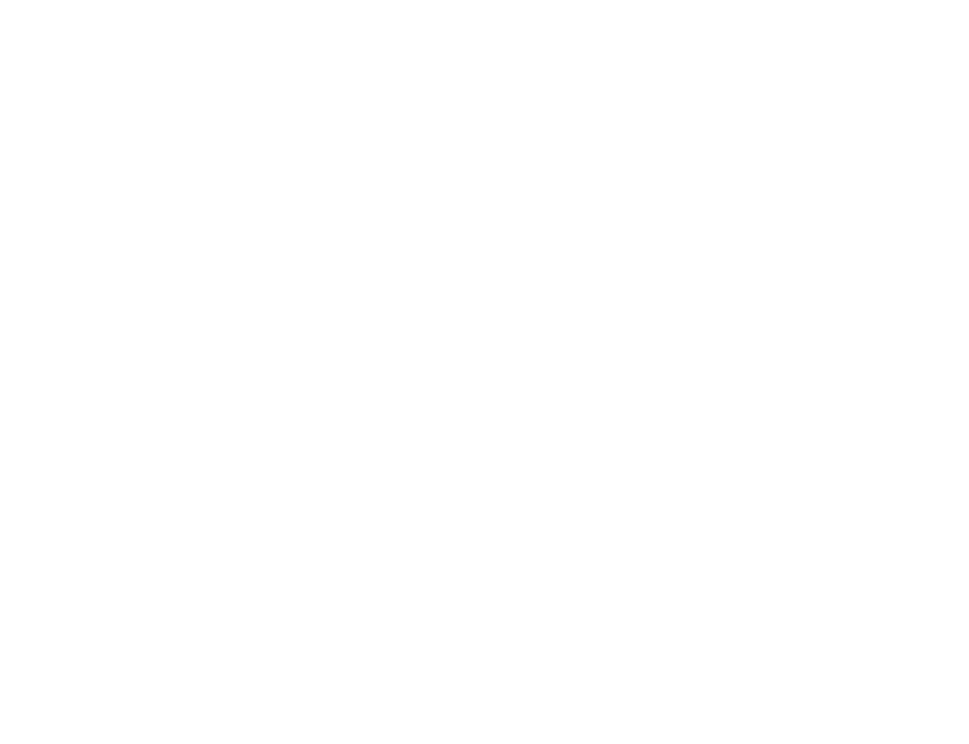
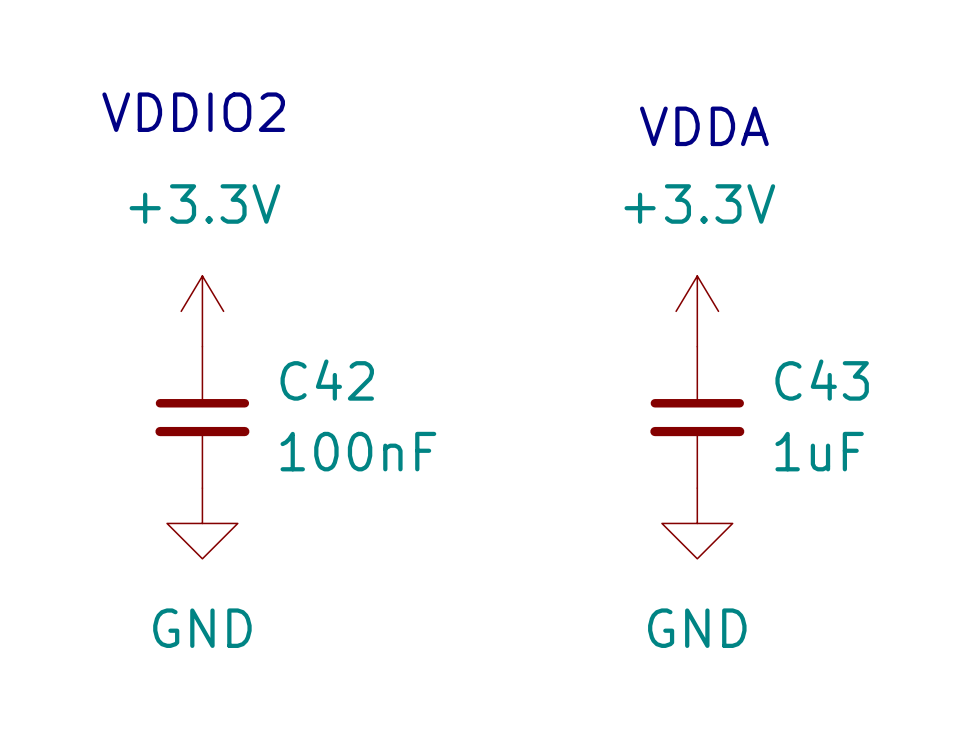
text: none -> VDDIO2 (193, 112)
text: none -> VDDA (704, 126)
power symbol: none -> +3.3V (202, 311)
power symbol: none -> +3.3V (697, 311)
C42: none -> 100nF (202, 417)
C43: none -> 1uF (697, 417)
power symbol: none -> GND (202, 523)
power symbol: none -> GND (697, 523)

